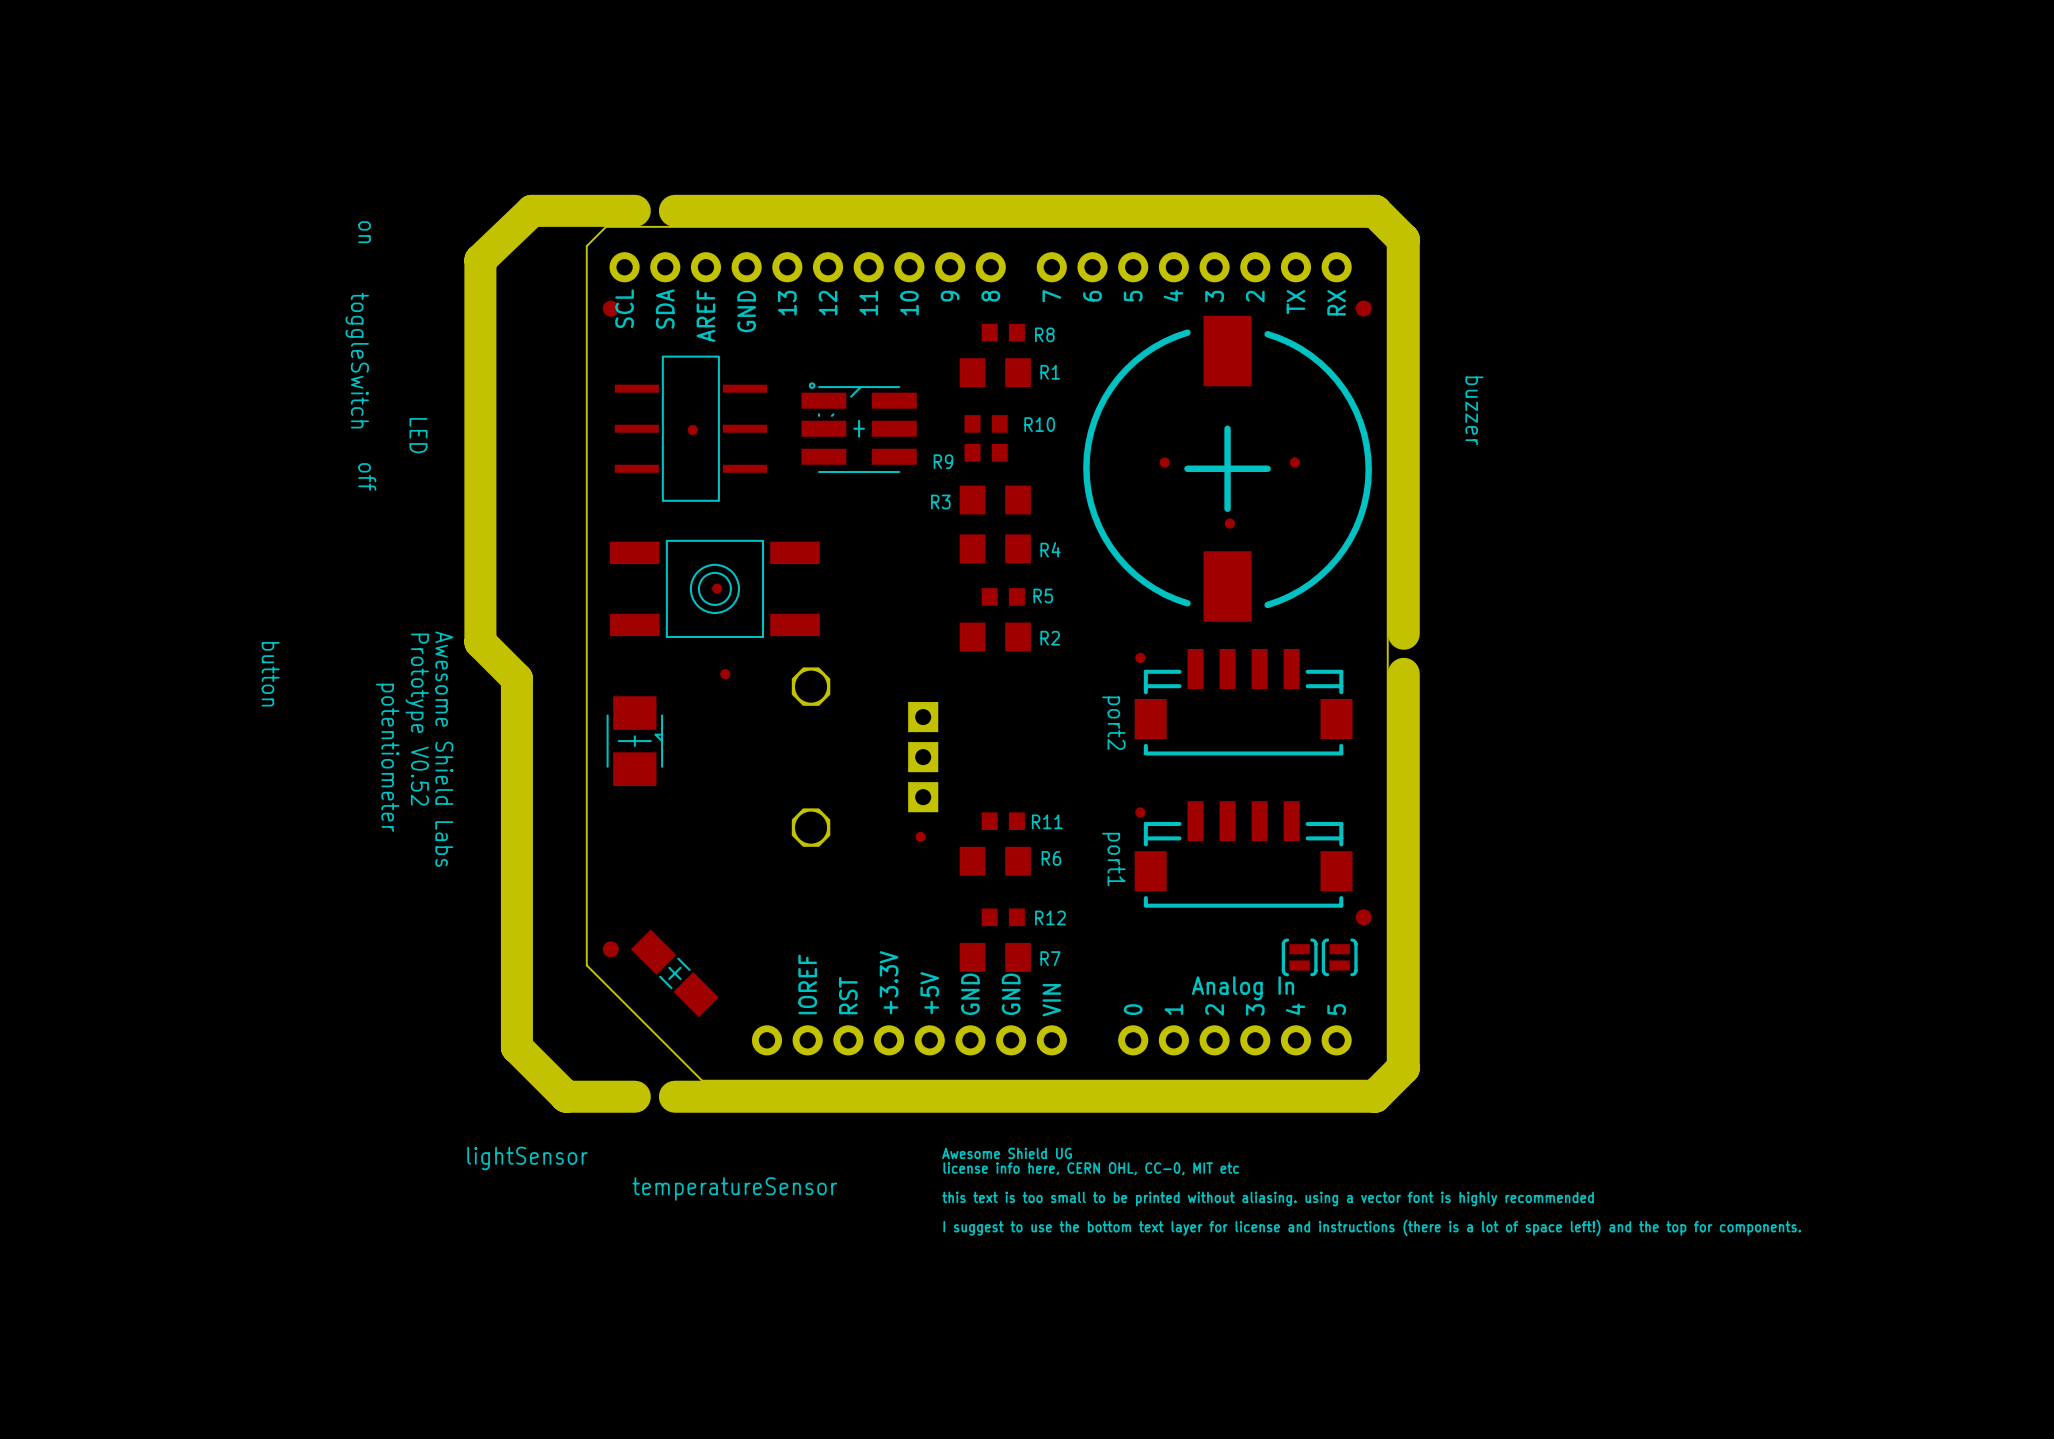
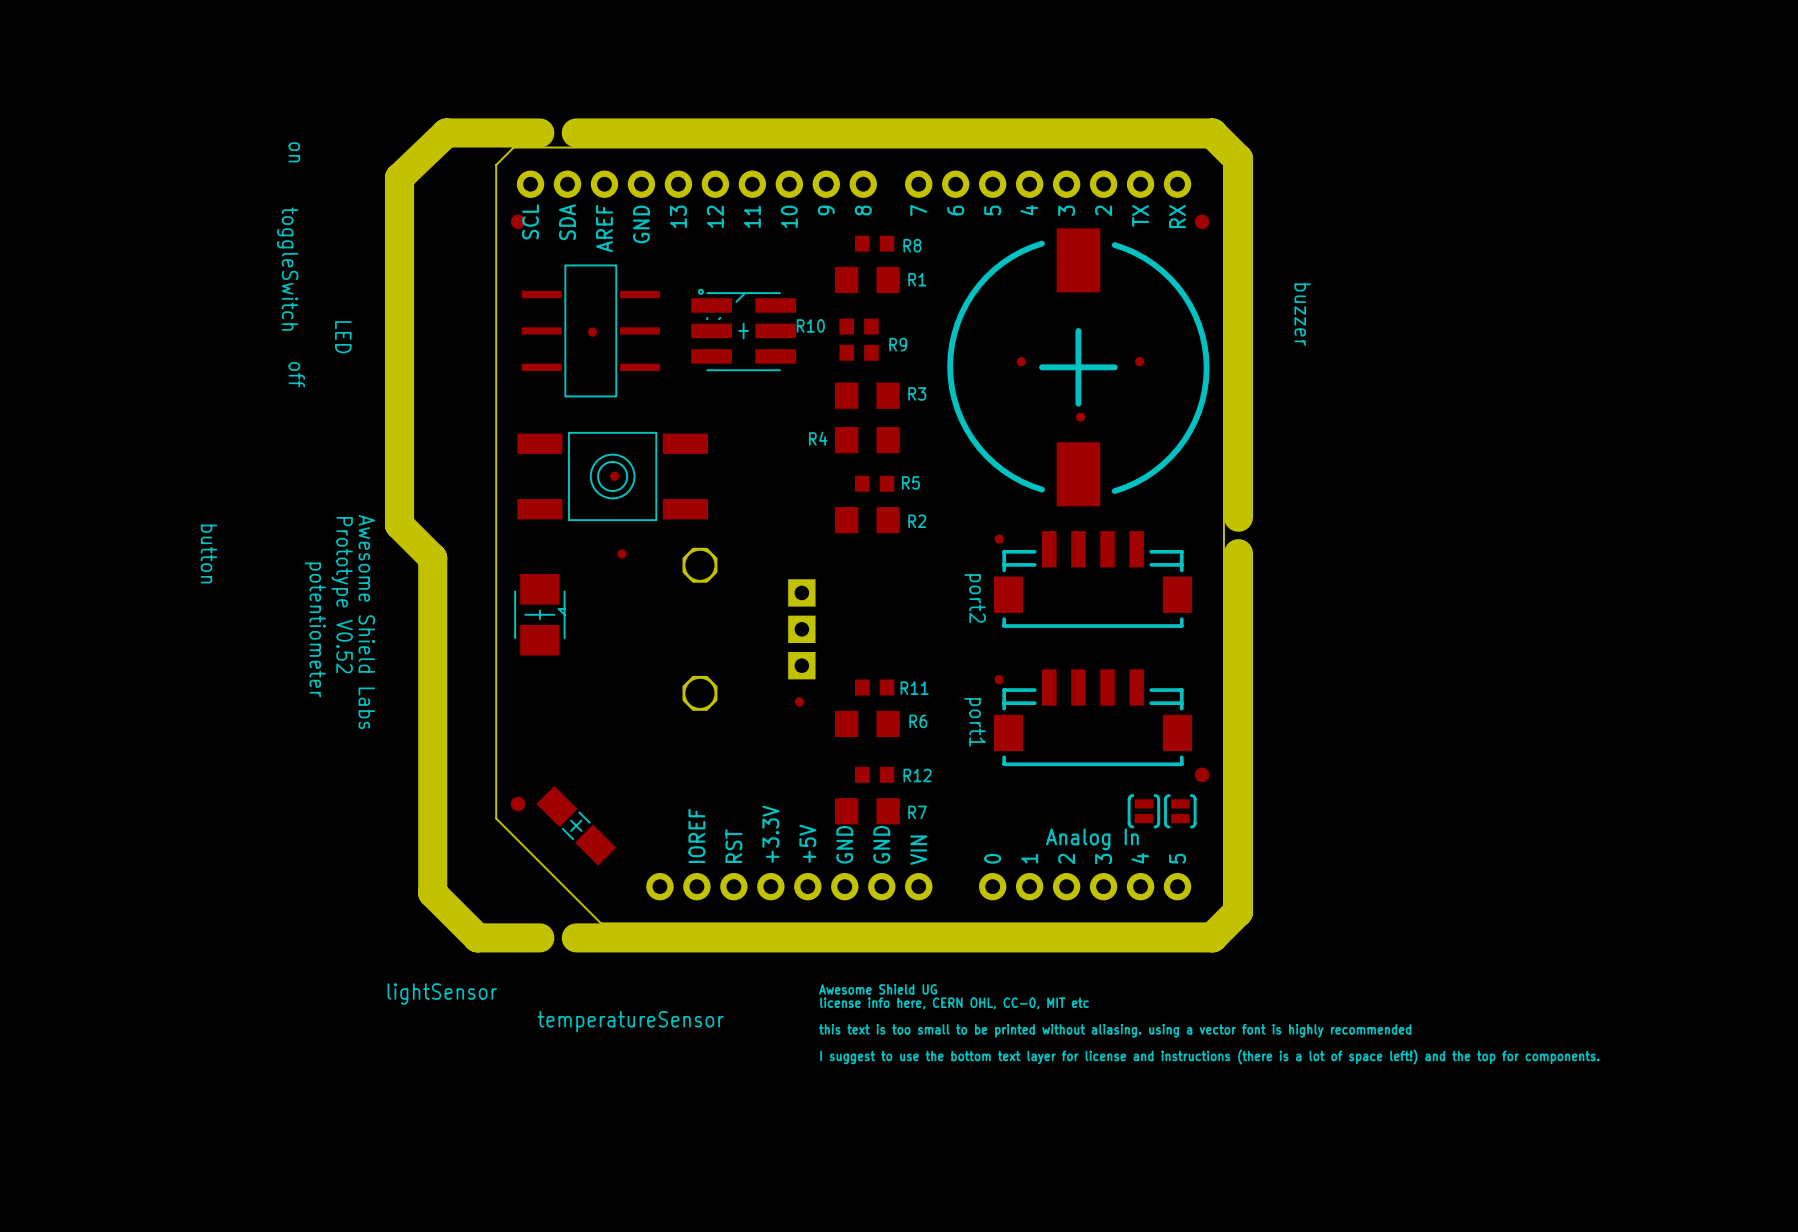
R10 name position: R10 (1039, 424) -> R10 (810, 325)
R9 name position: R9 (943, 461) -> R9 (898, 344)
R3 name position: R3 (940, 501) -> R3 (917, 393)
R4 name position: R4 (1050, 549) -> R4 (818, 438)

